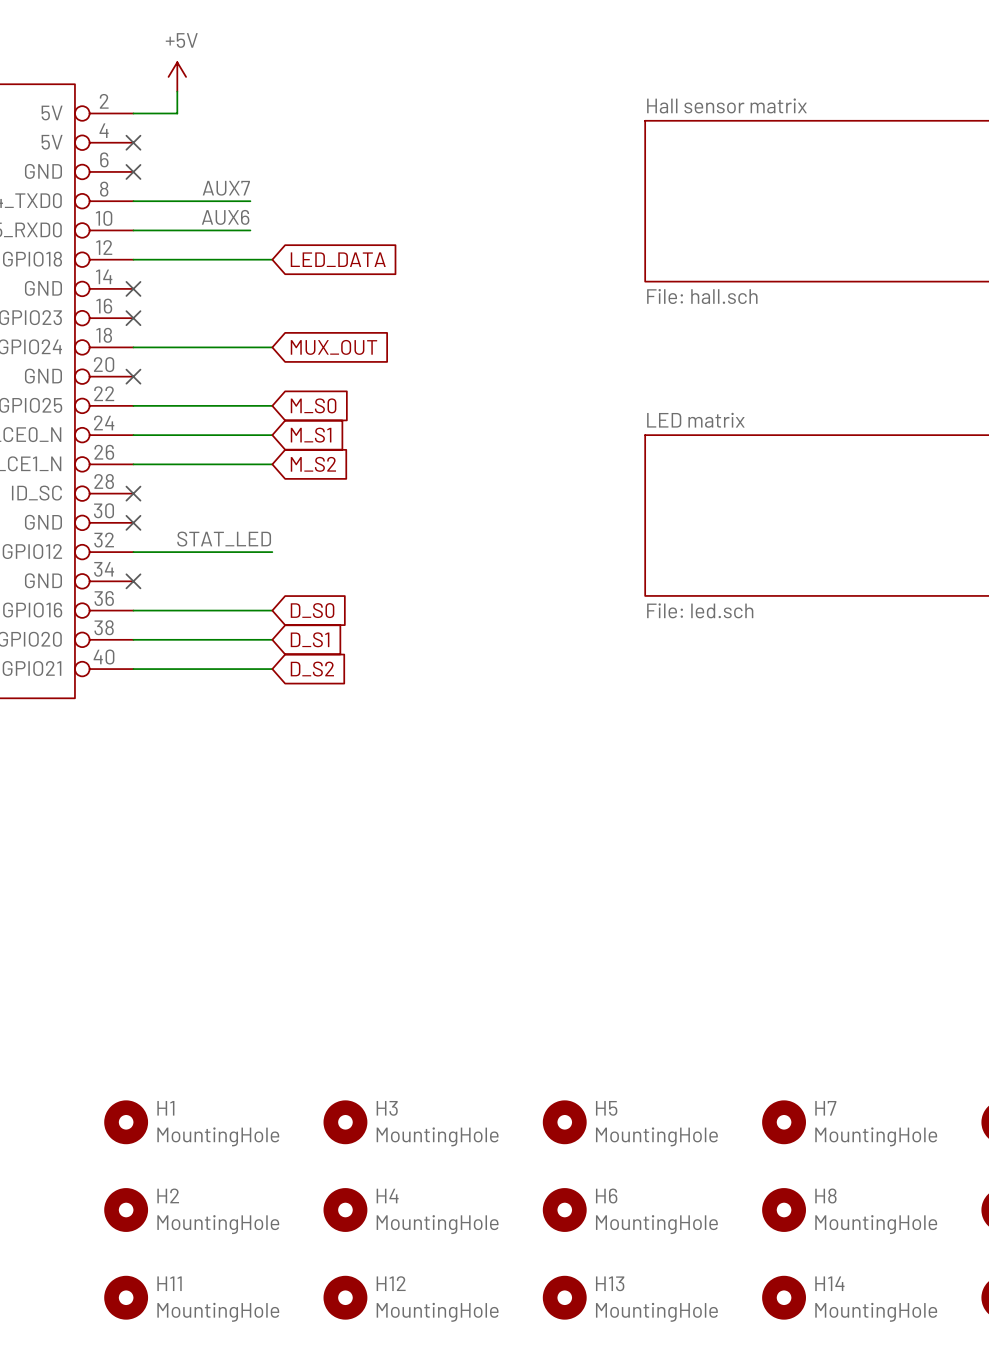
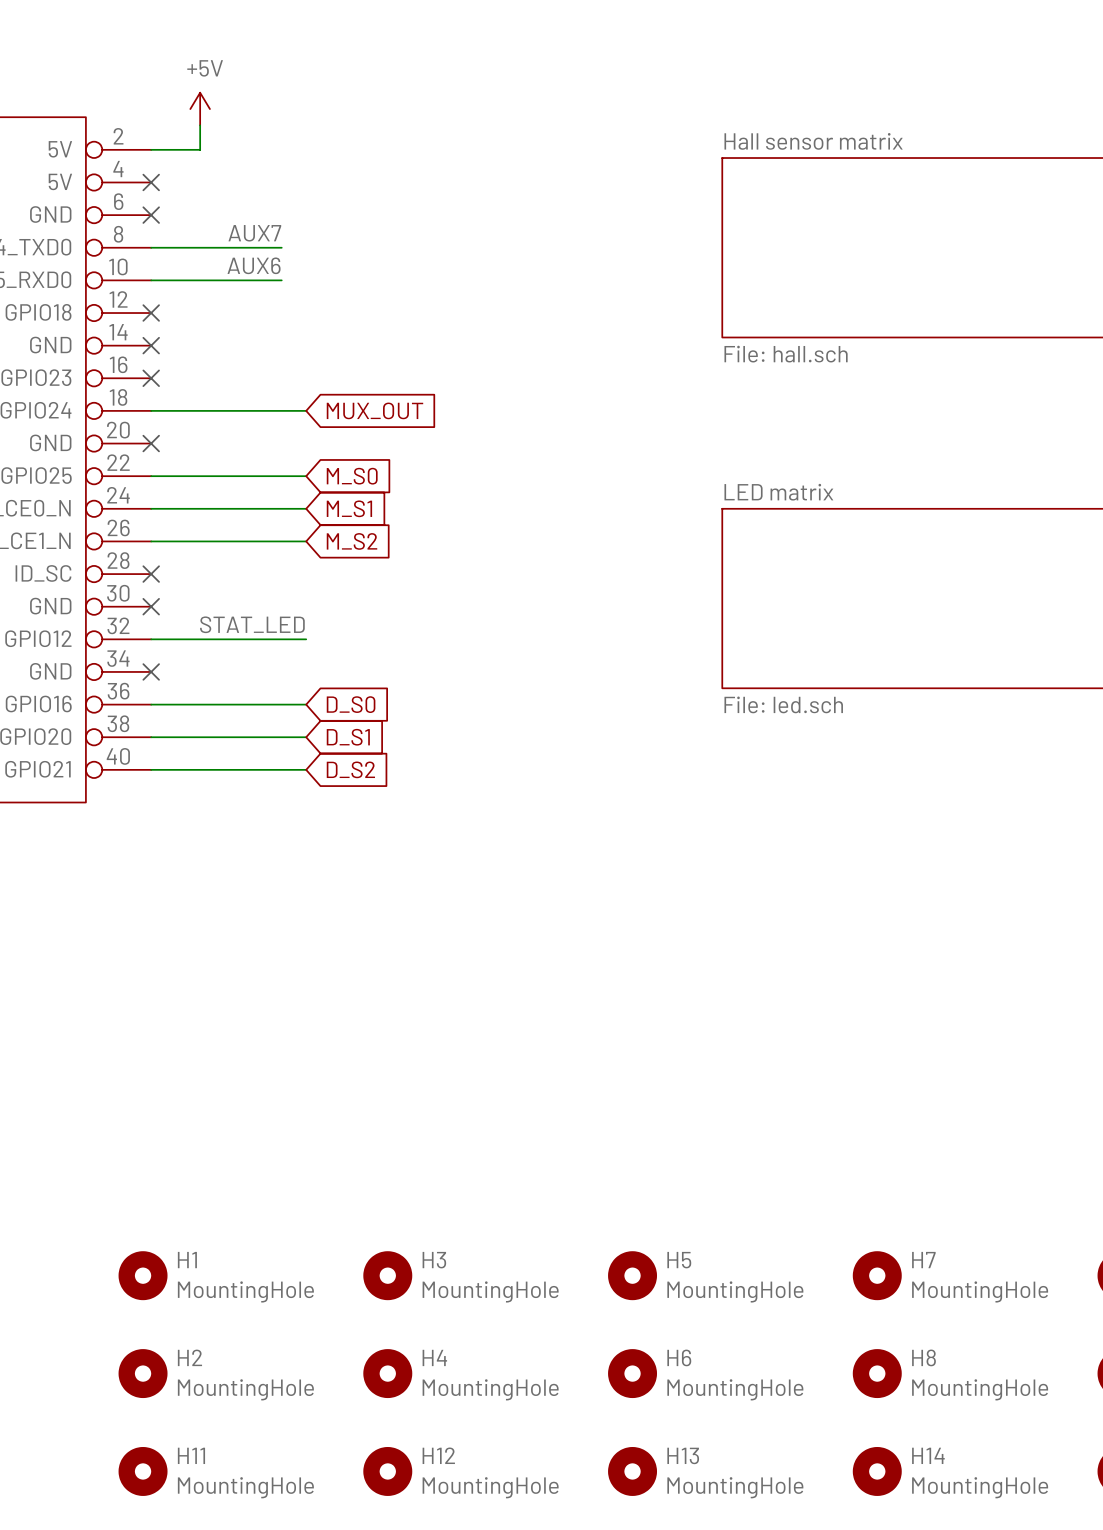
wire: (133, 259) (272, 259) -> none
no-connect mark: none -> (151, 313)
global label: LED_DATA (338, 259) -> none

